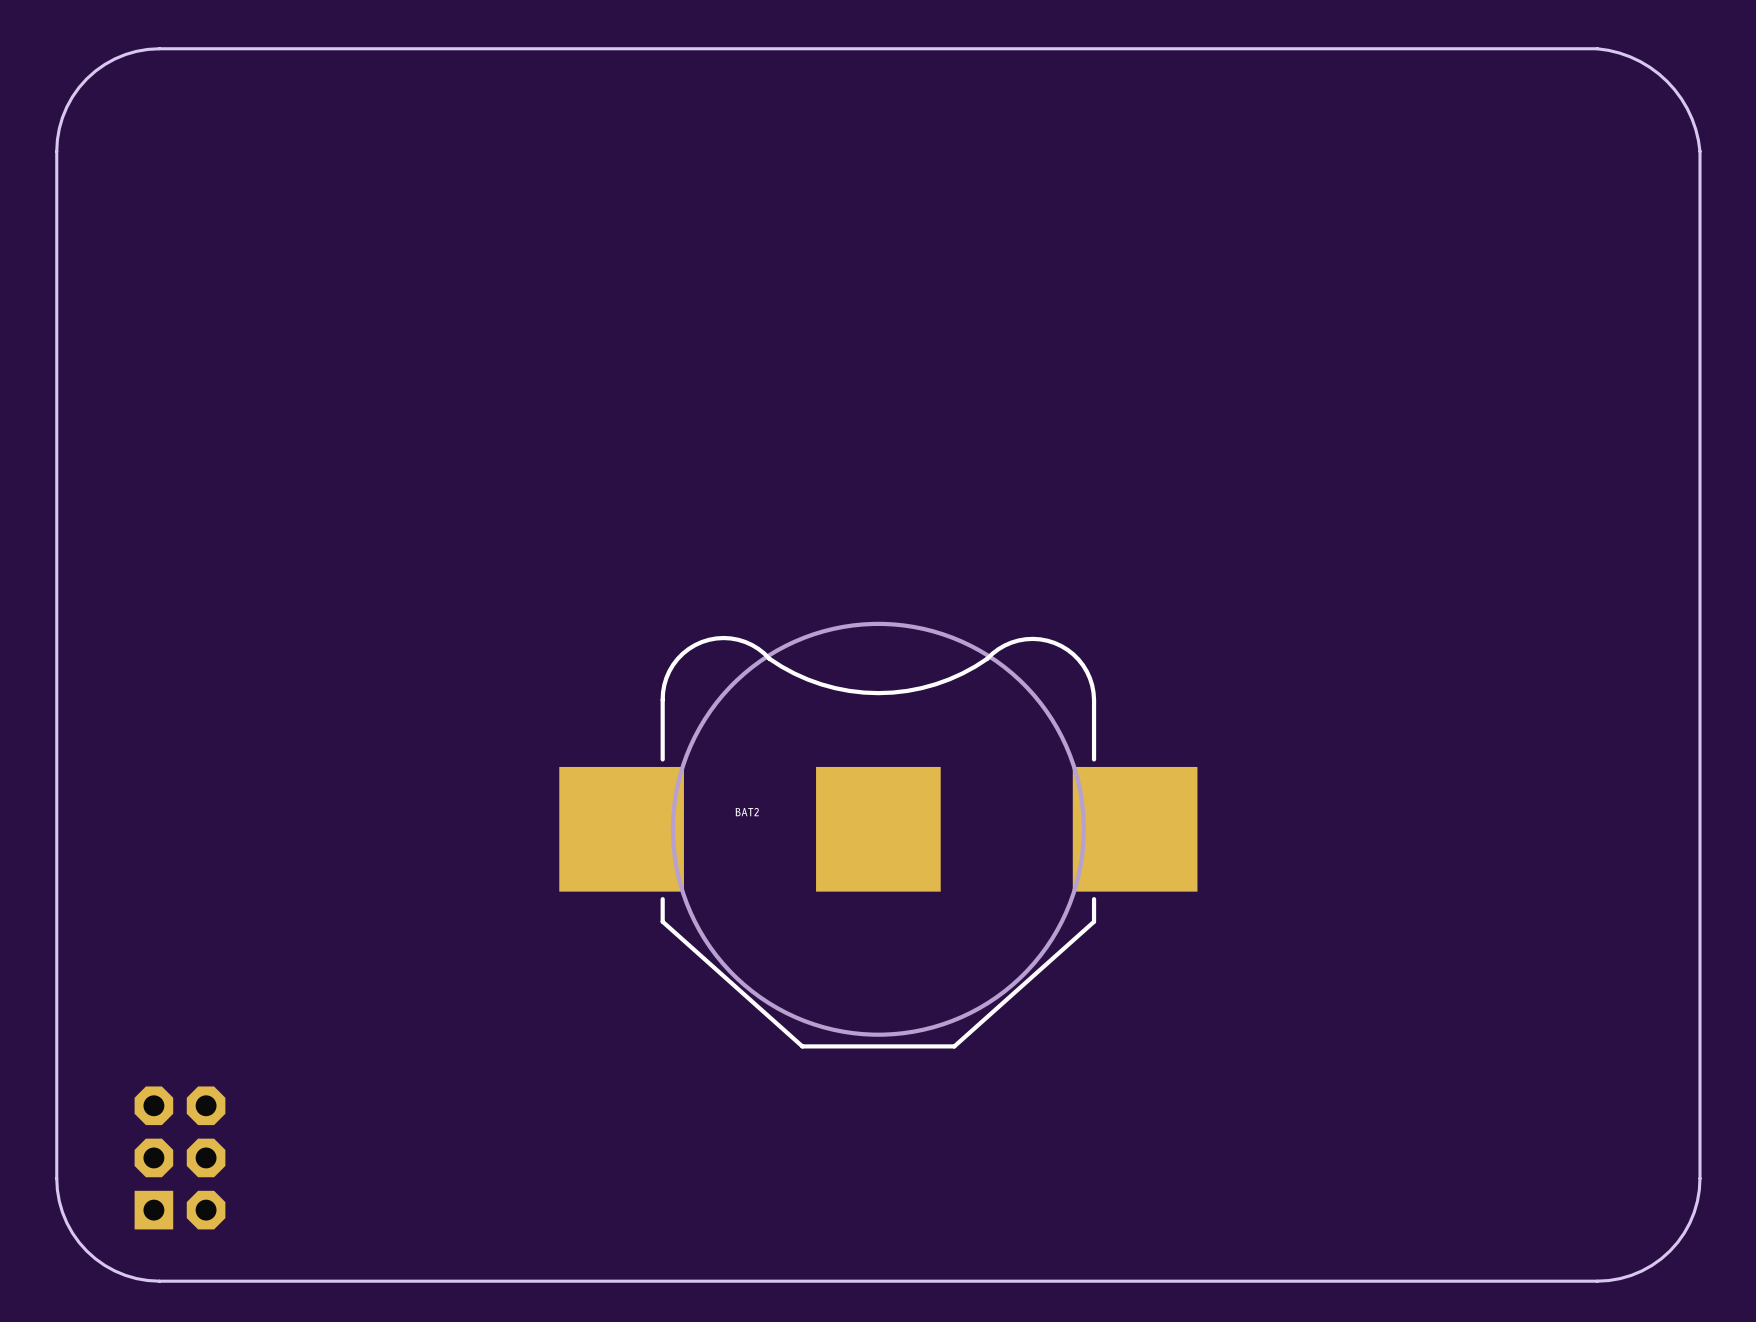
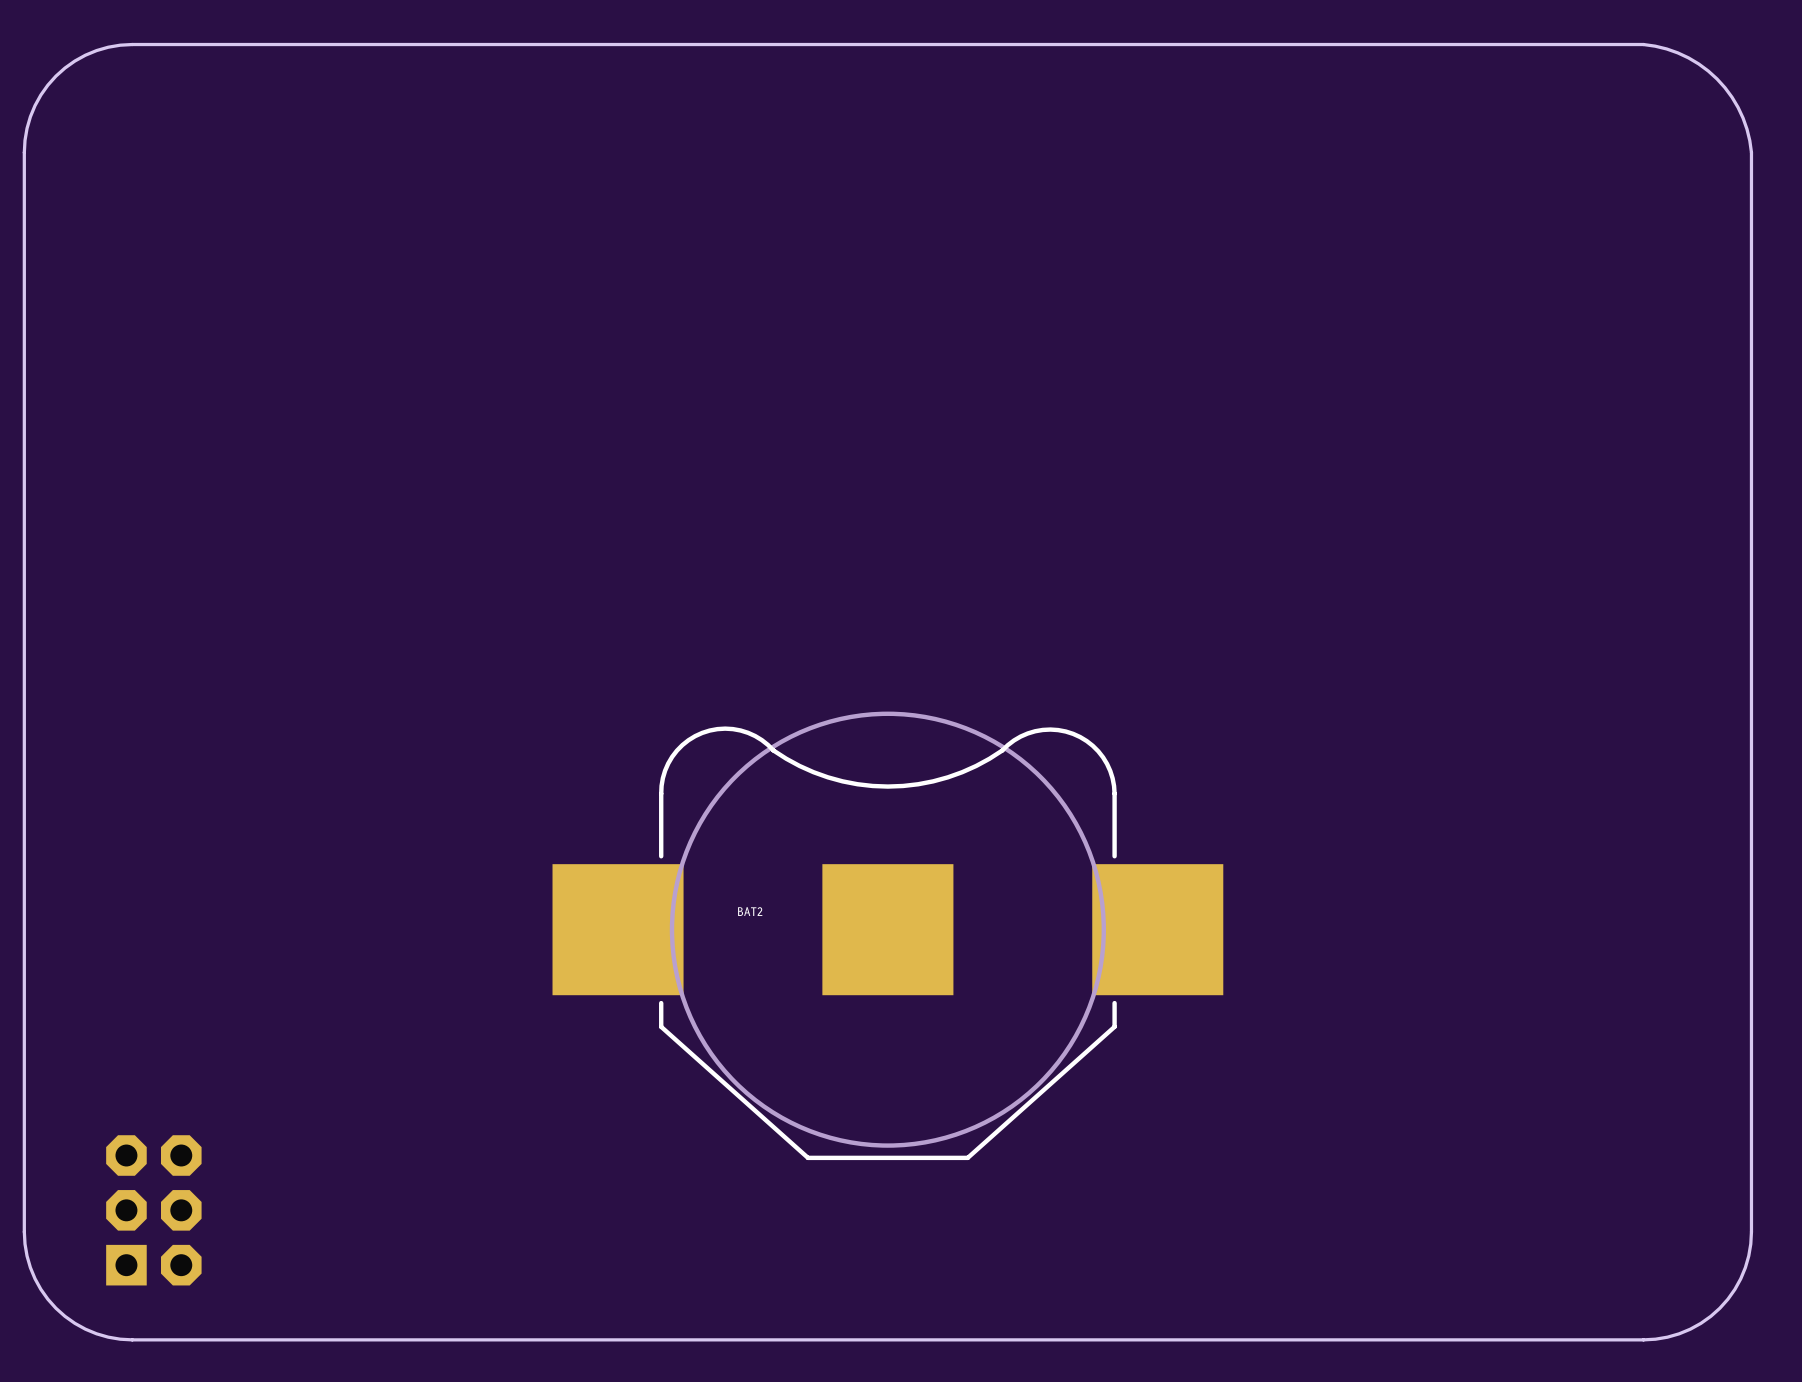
BAT2 position: (878, 835) -> (887, 935)

